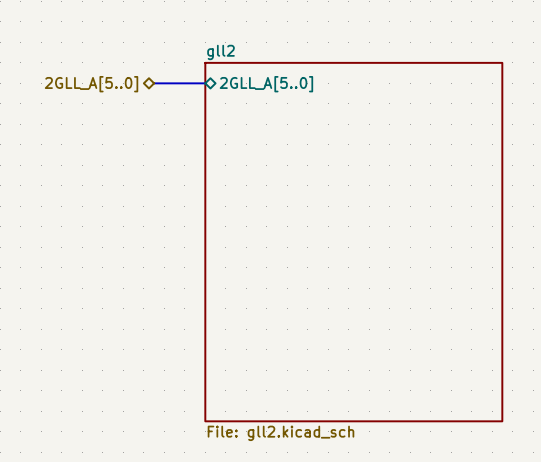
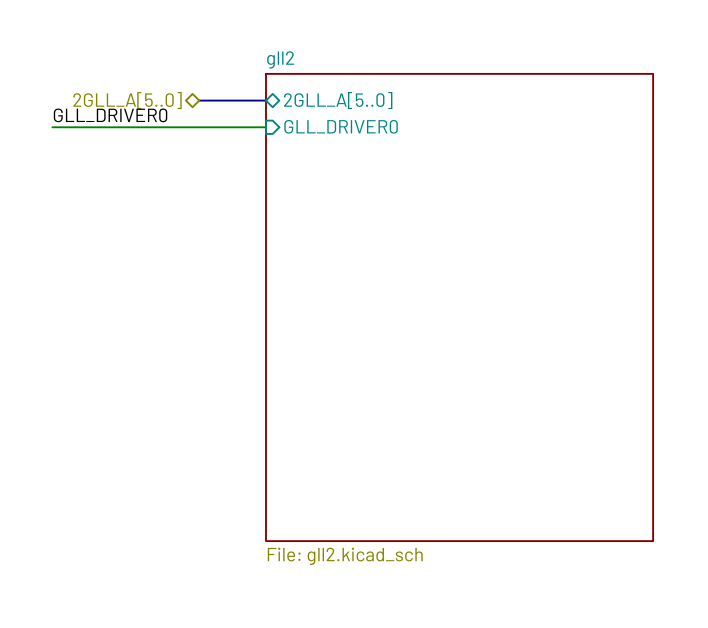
label: none -> GLL_DRIVER0 (110, 115)
wire: none -> (52, 127) (266, 127)
sheet pin: none -> GLL_DRIVER0 (341, 126)

